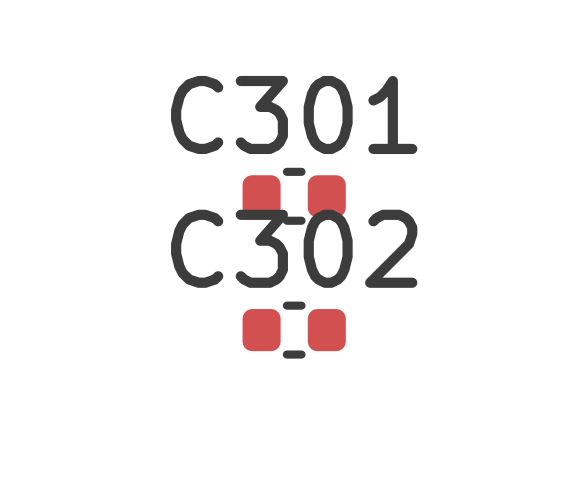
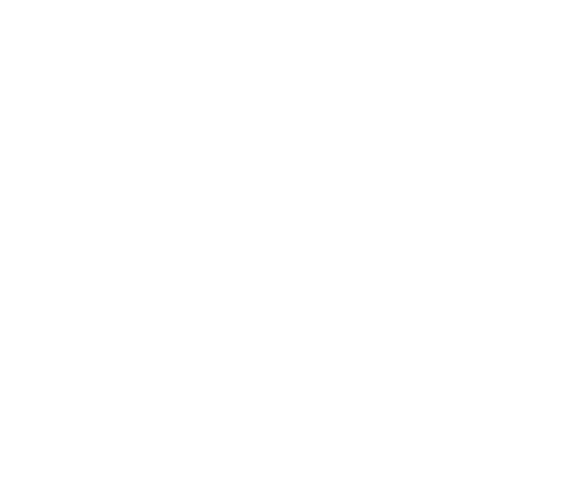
C301: (294, 196) -> none
C302: (294, 330) -> none

